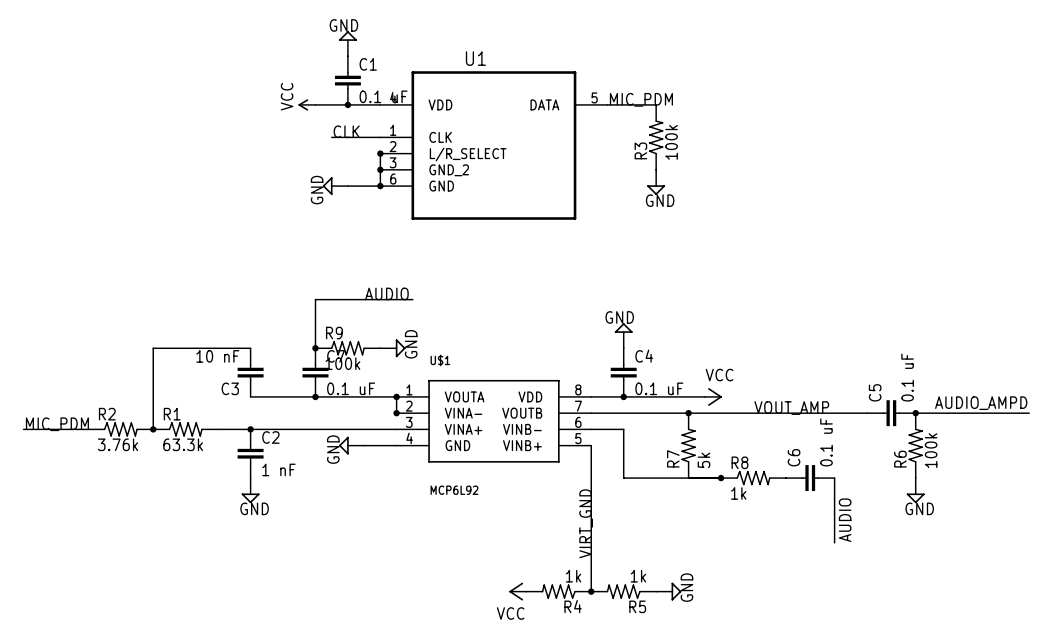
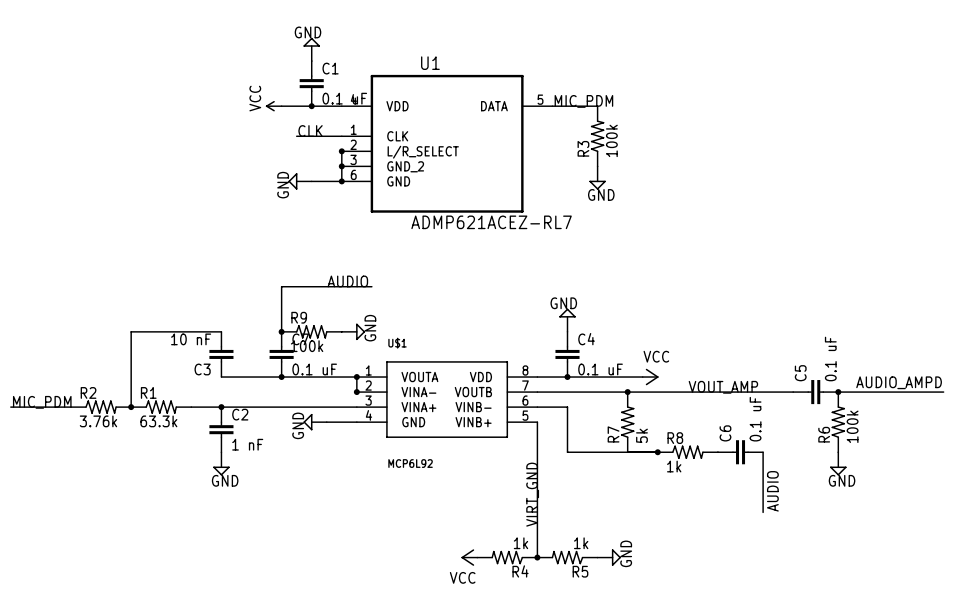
U1 value: none -> ADMP621ACEZ-RL7 (491, 222)

